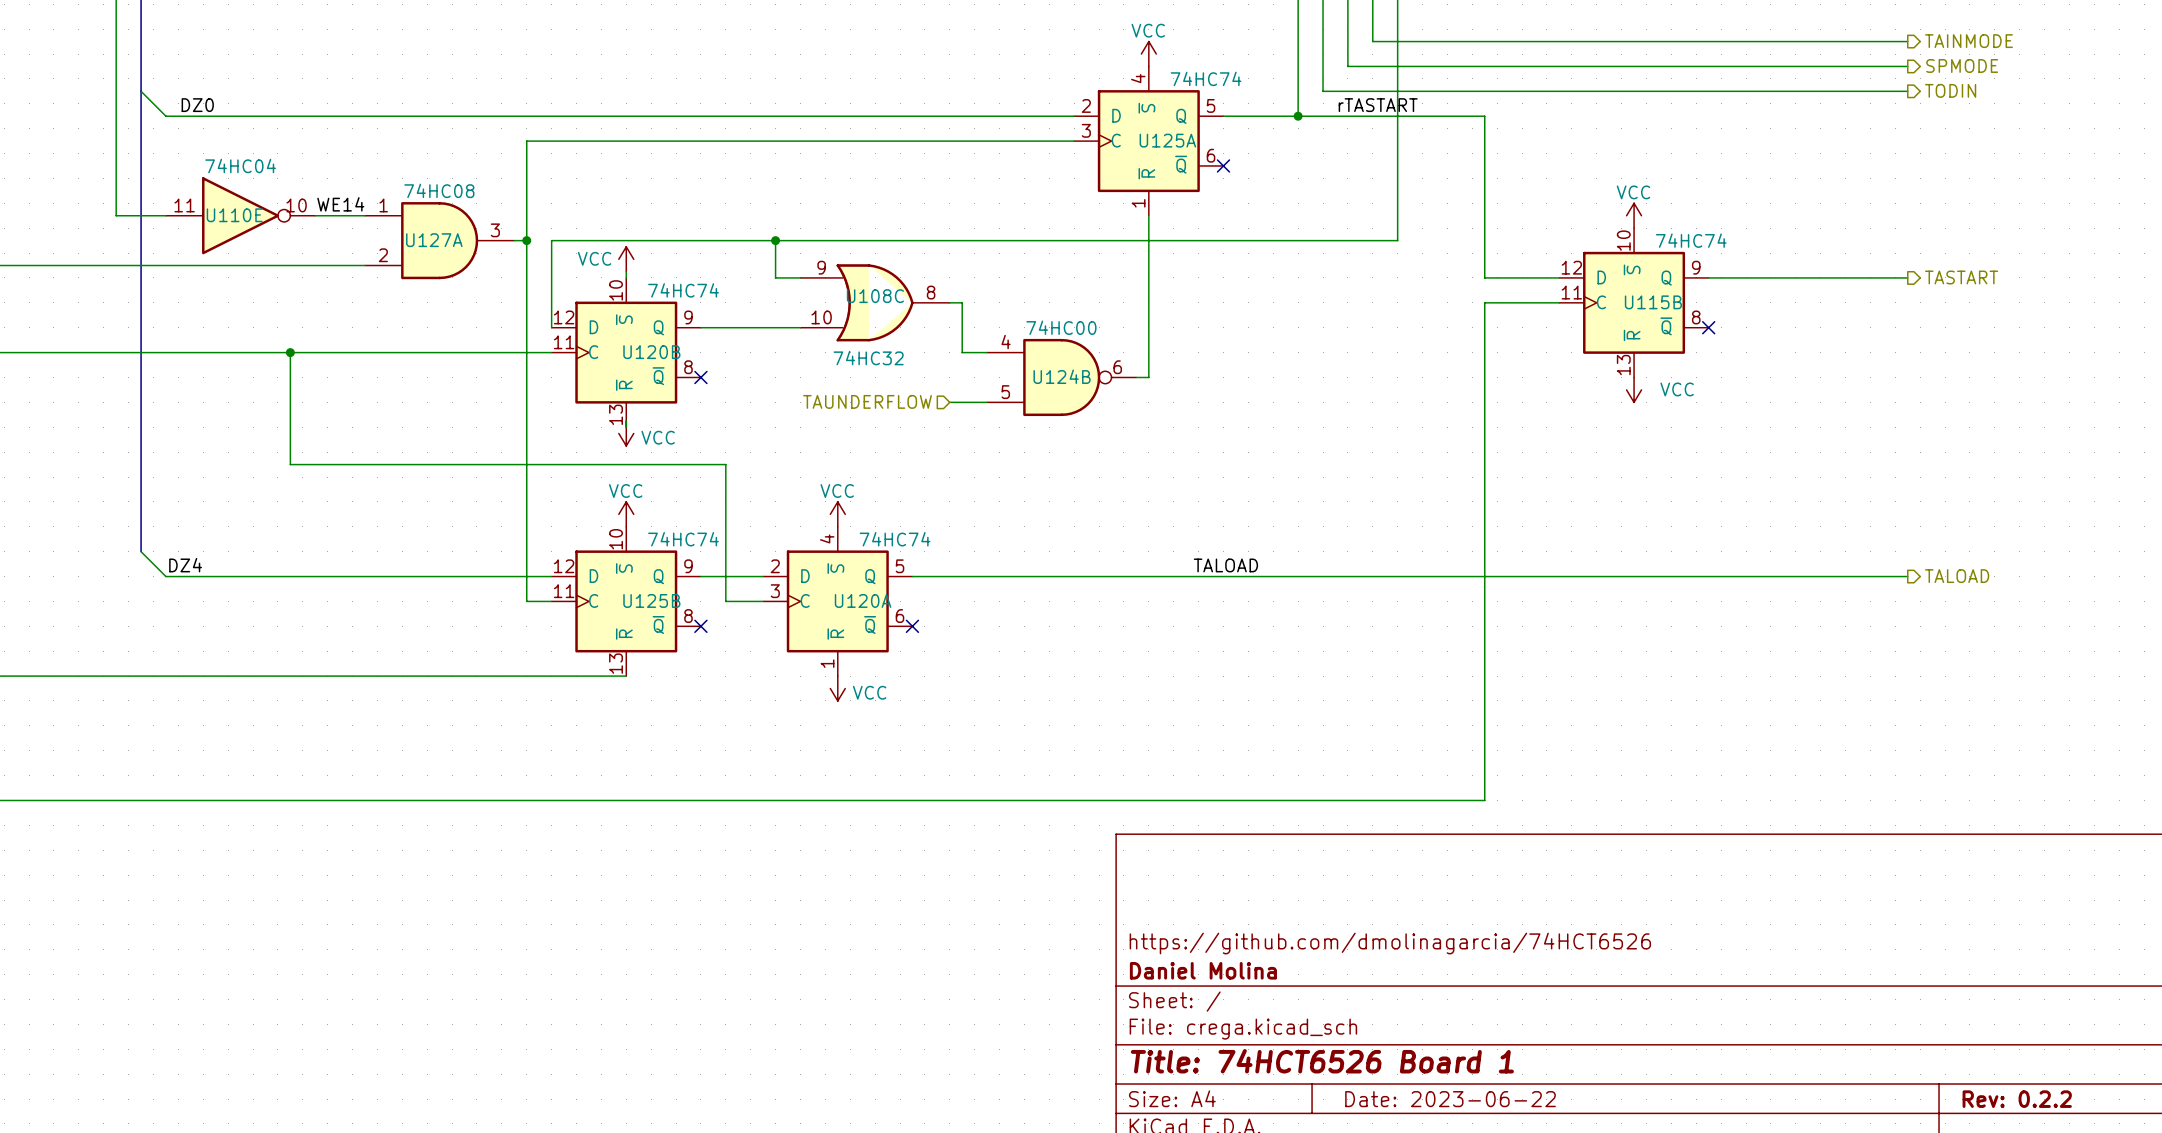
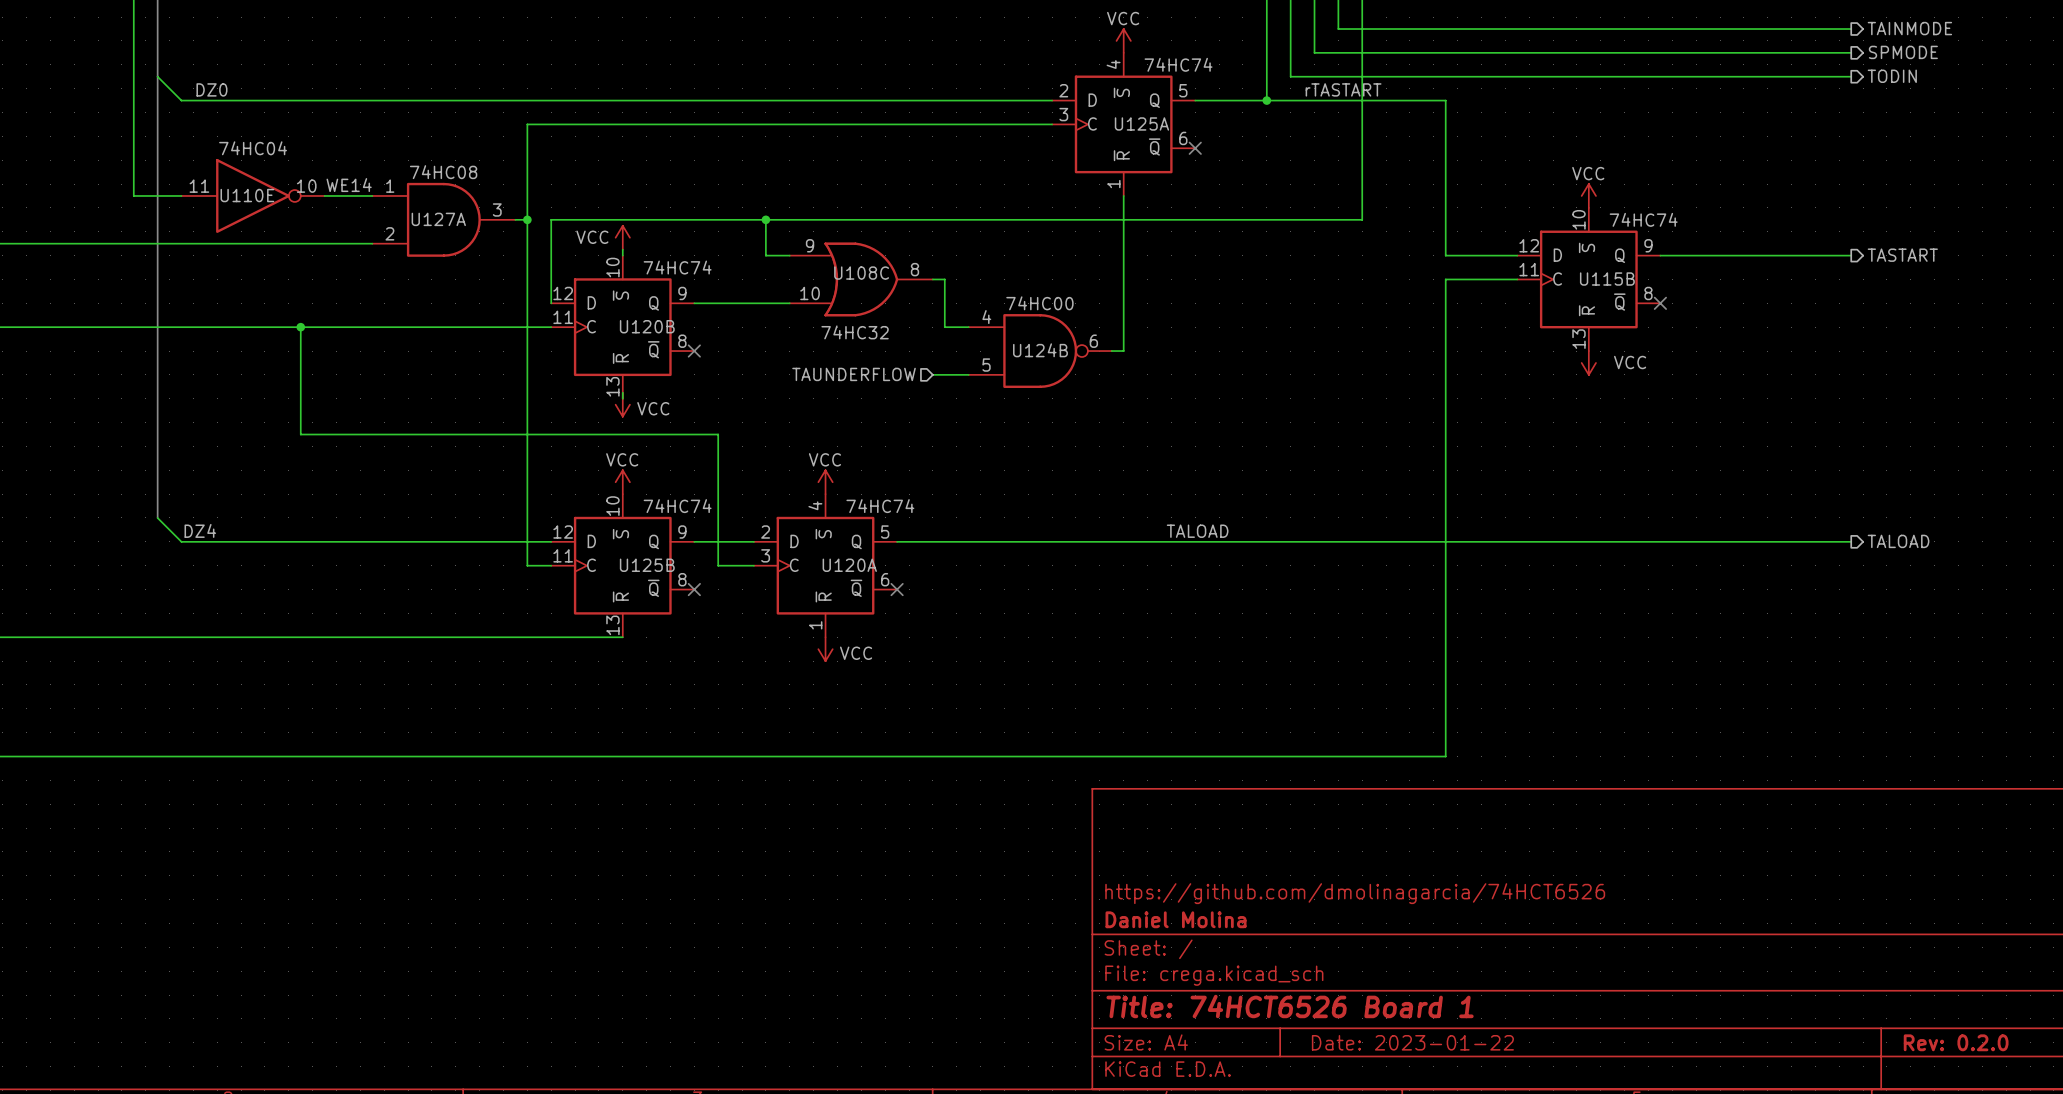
title block: Date: 2023-06-22 (1450, 1099) -> Date: 2023-01-22 (1412, 1042)
title block: Rev: 0.2.2 (2017, 1099) -> Rev: 0.2.0 (1956, 1042)

